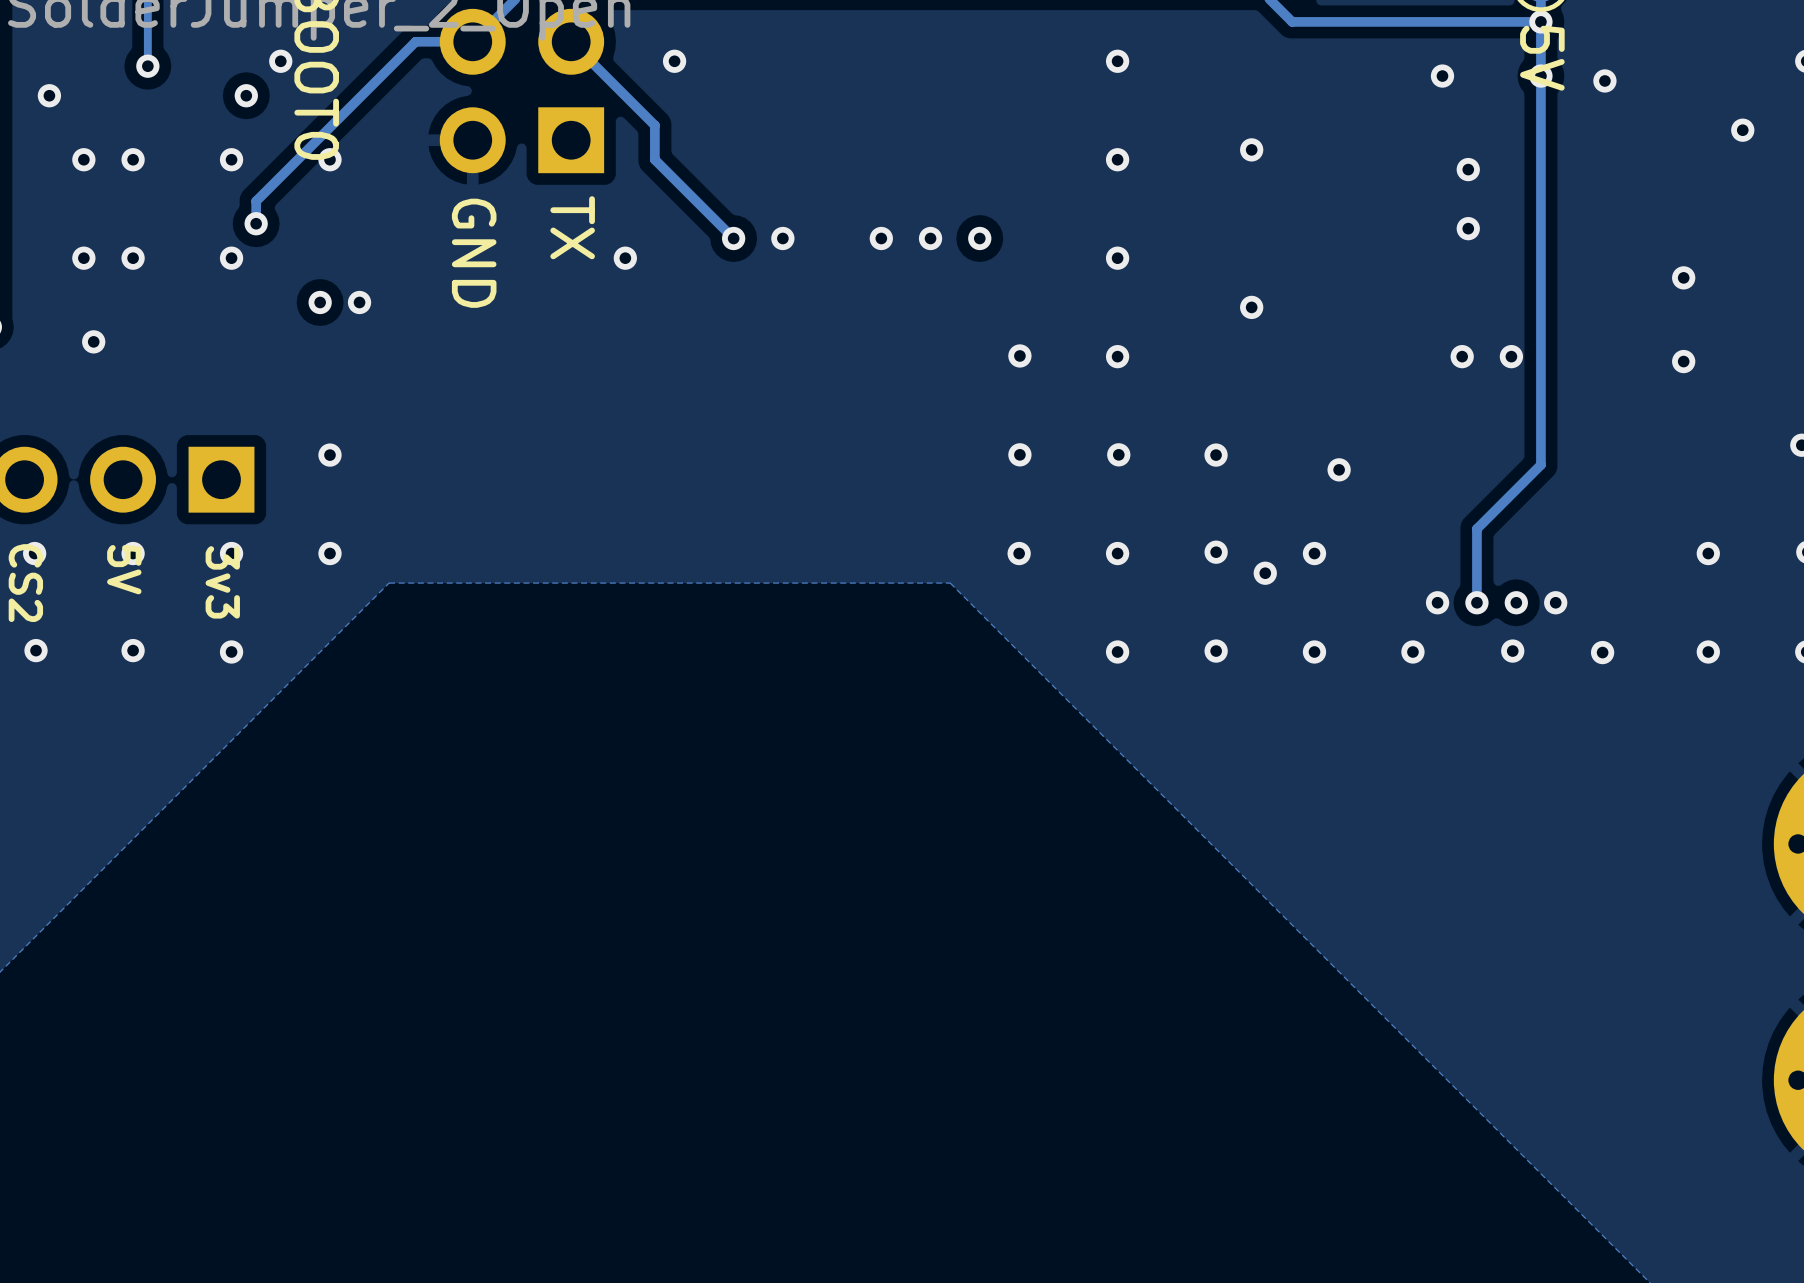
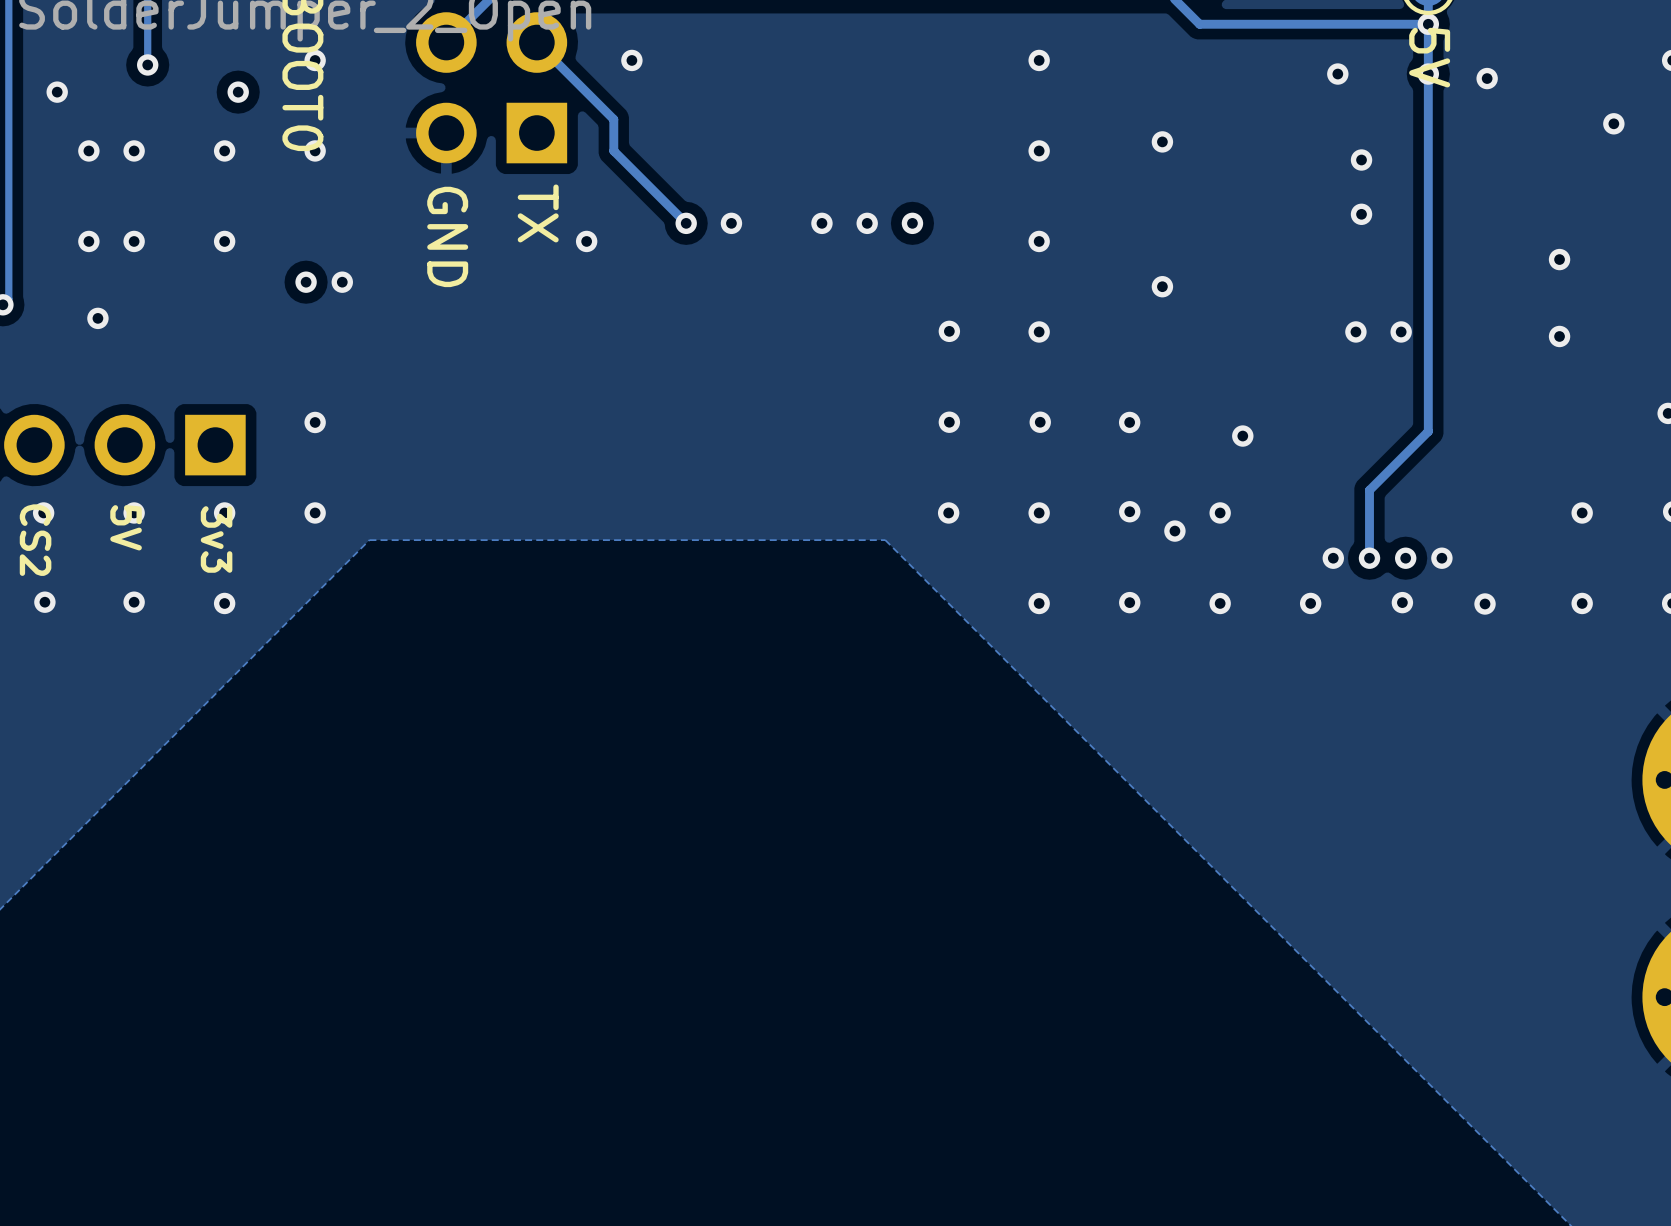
track: (472, 41) (415, 41) (256, 201) (256, 223) -> none
via position: (280, 61) -> (315, 60)
via: (256, 223) -> none

